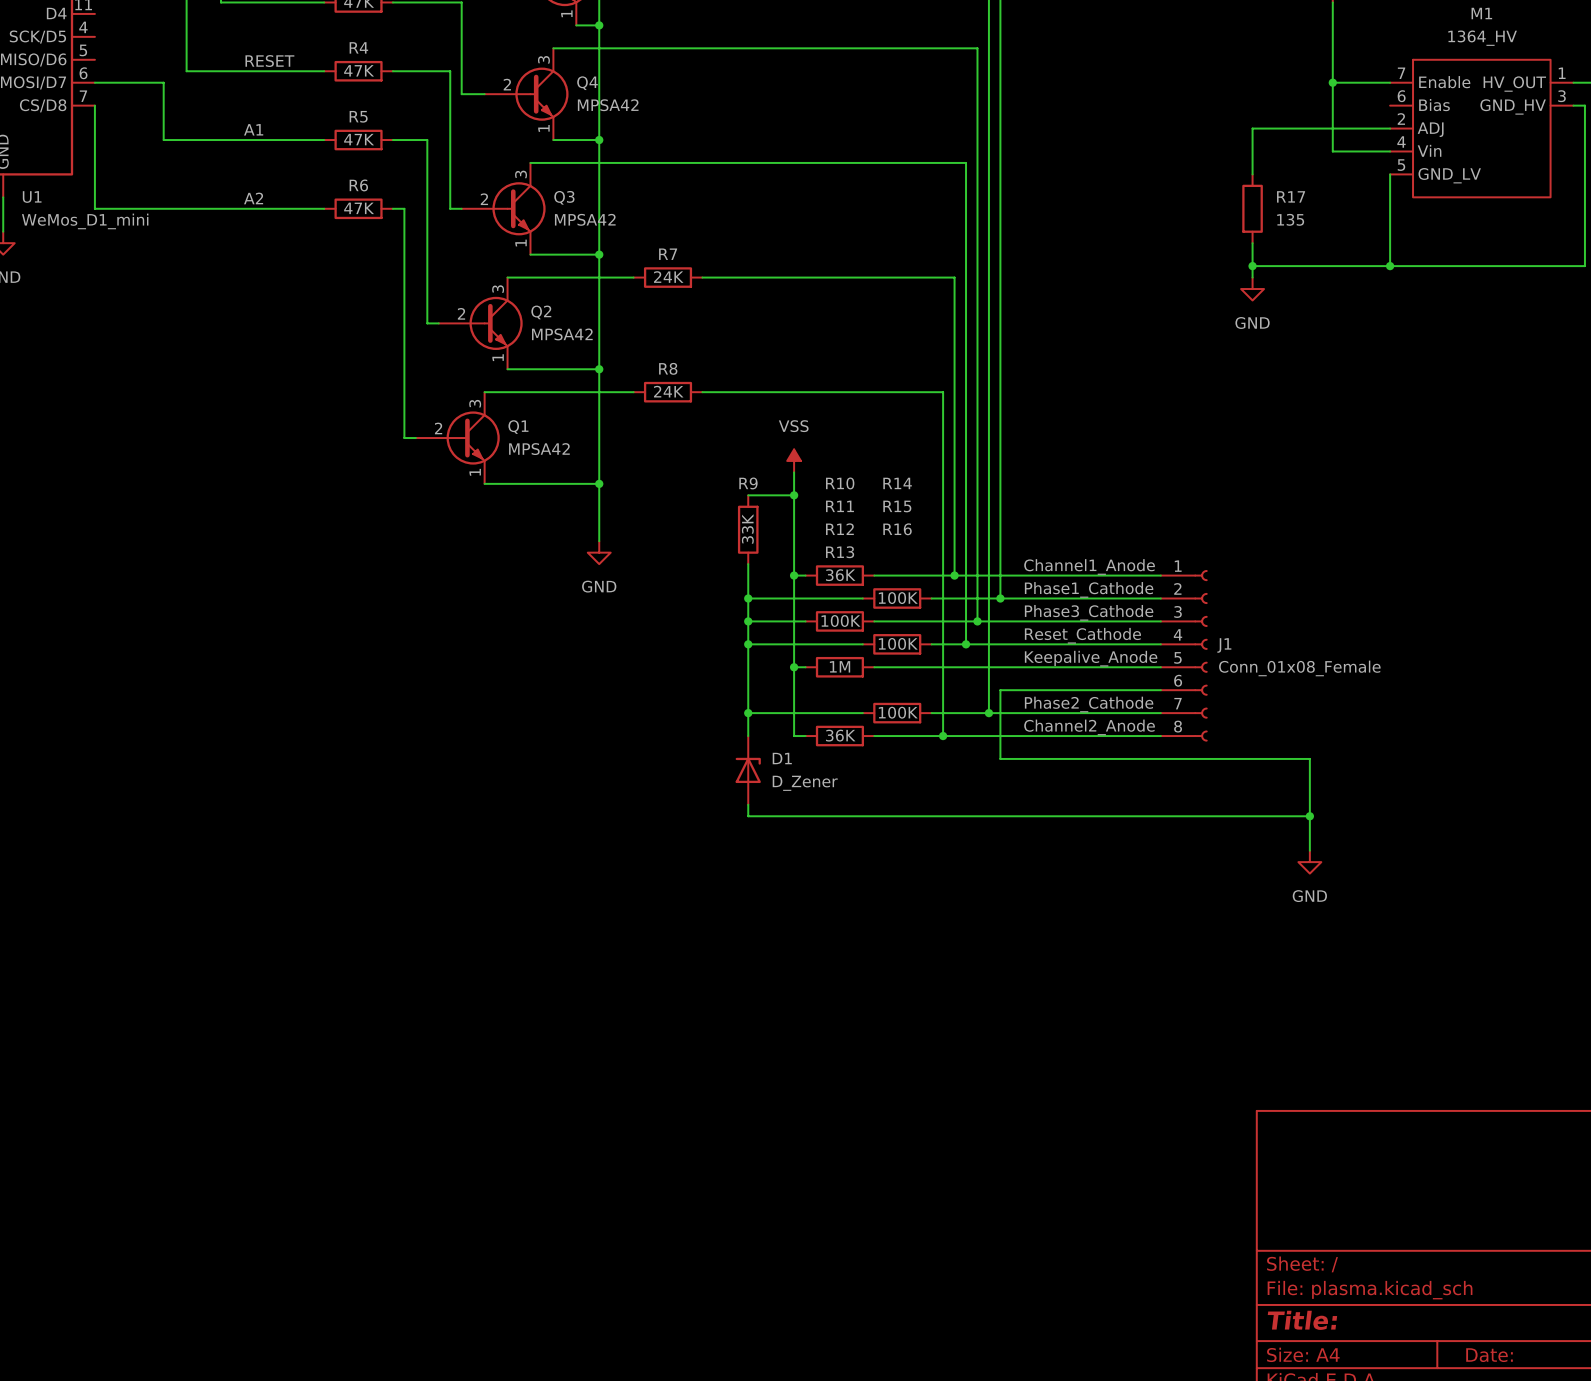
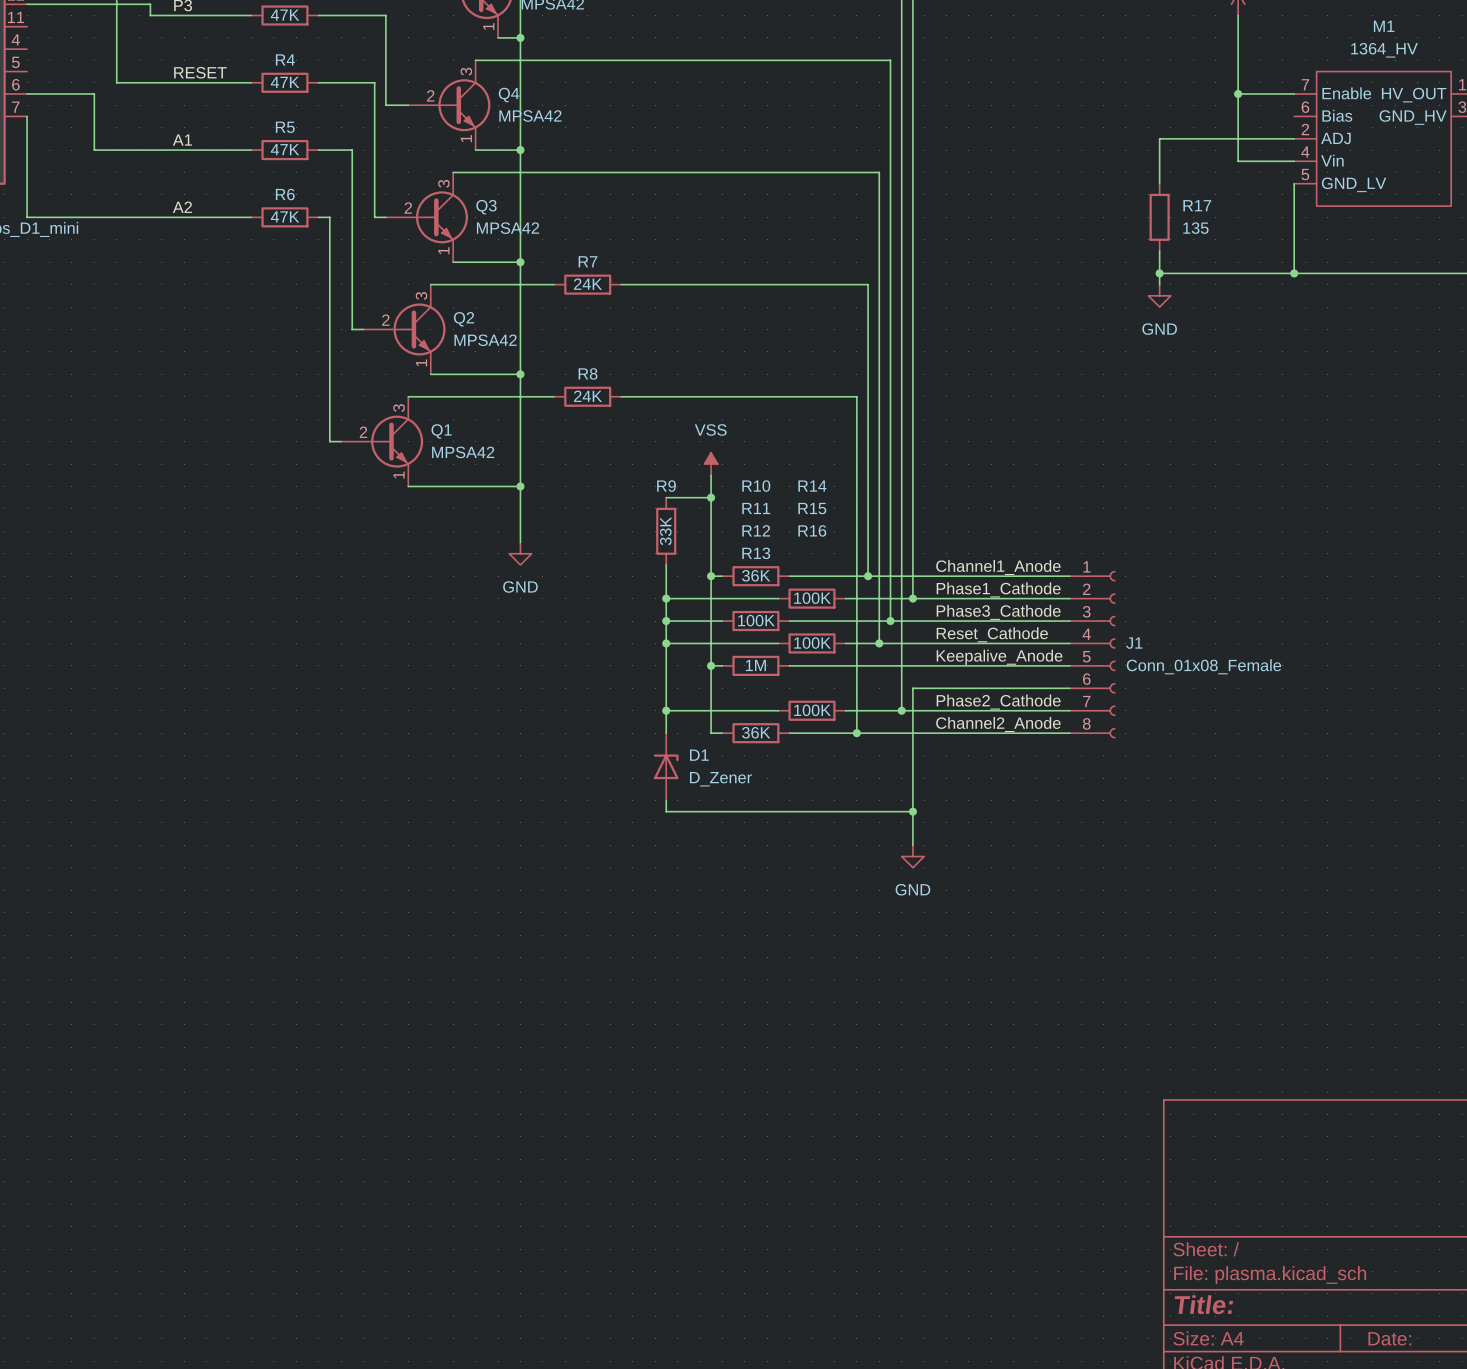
wire: (1000, 758) (1309, 758) (1309, 850) -> (912, 755) (912, 845)
wire: (1000, 816) (1309, 816) -> none
junction: none -> (912, 811)
junction: (1309, 816) -> none
power symbol: none -> GND (912, 856)
power symbol: GND (1309, 862) -> none

